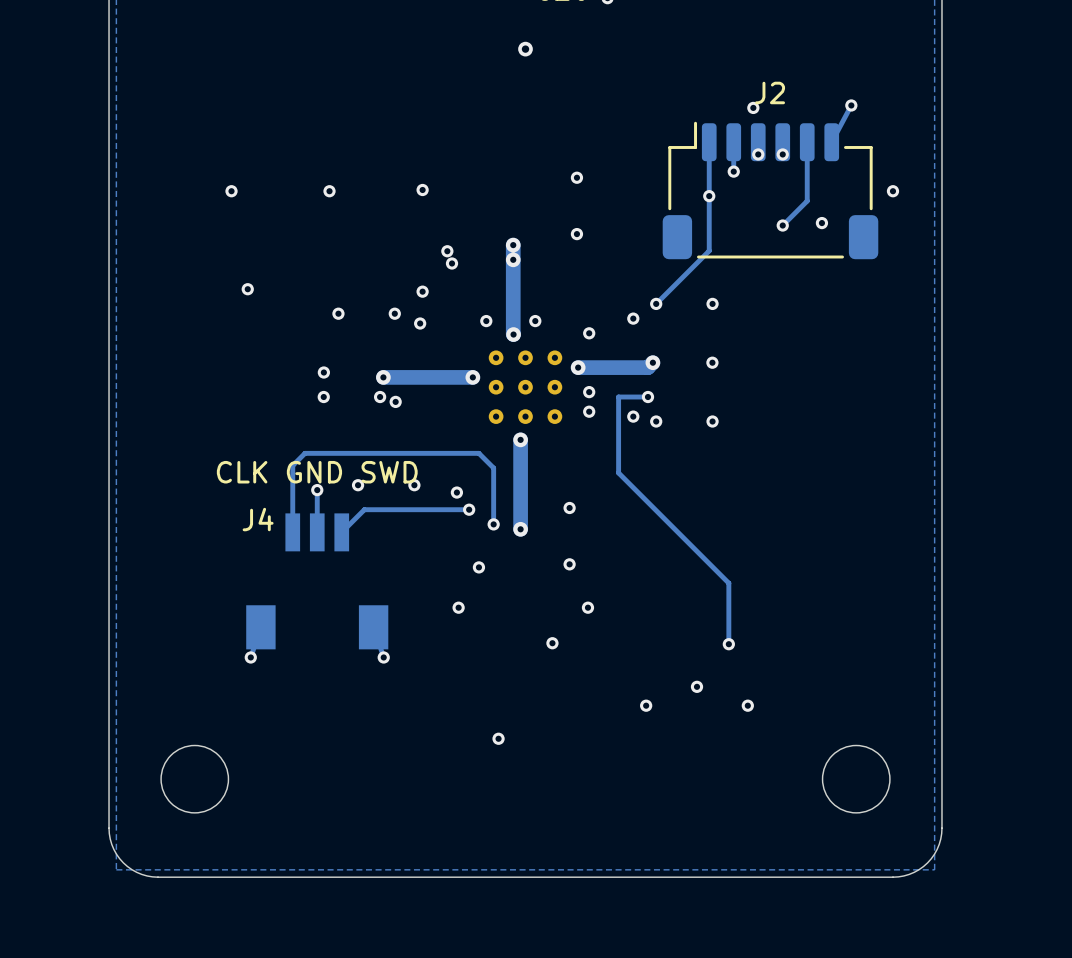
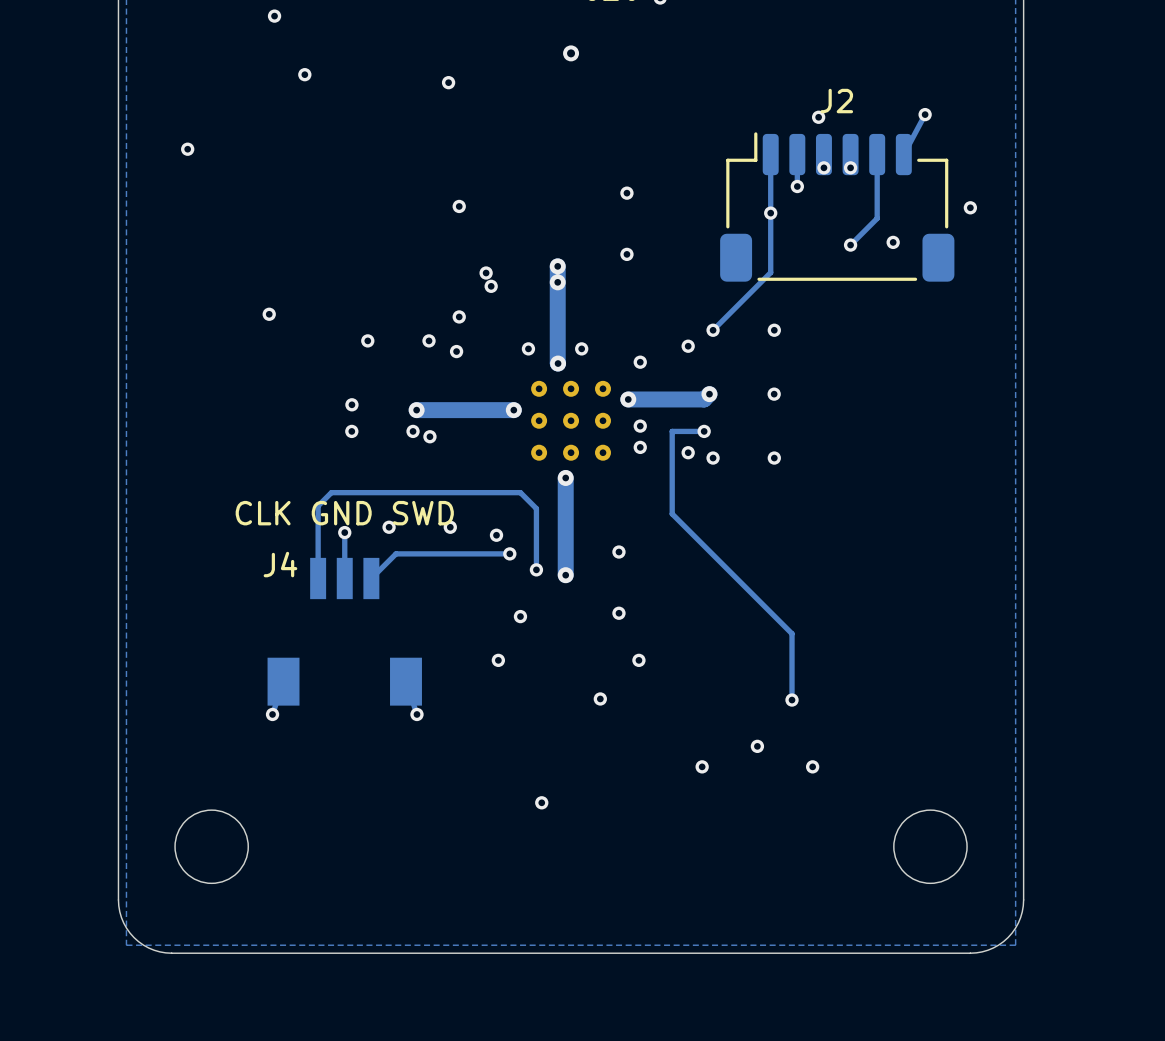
via: none -> (274, 16)
via: none -> (304, 74)
via: none -> (448, 82)
via: none -> (187, 149)
via: (231, 191) -> none
via: (329, 191) -> none

